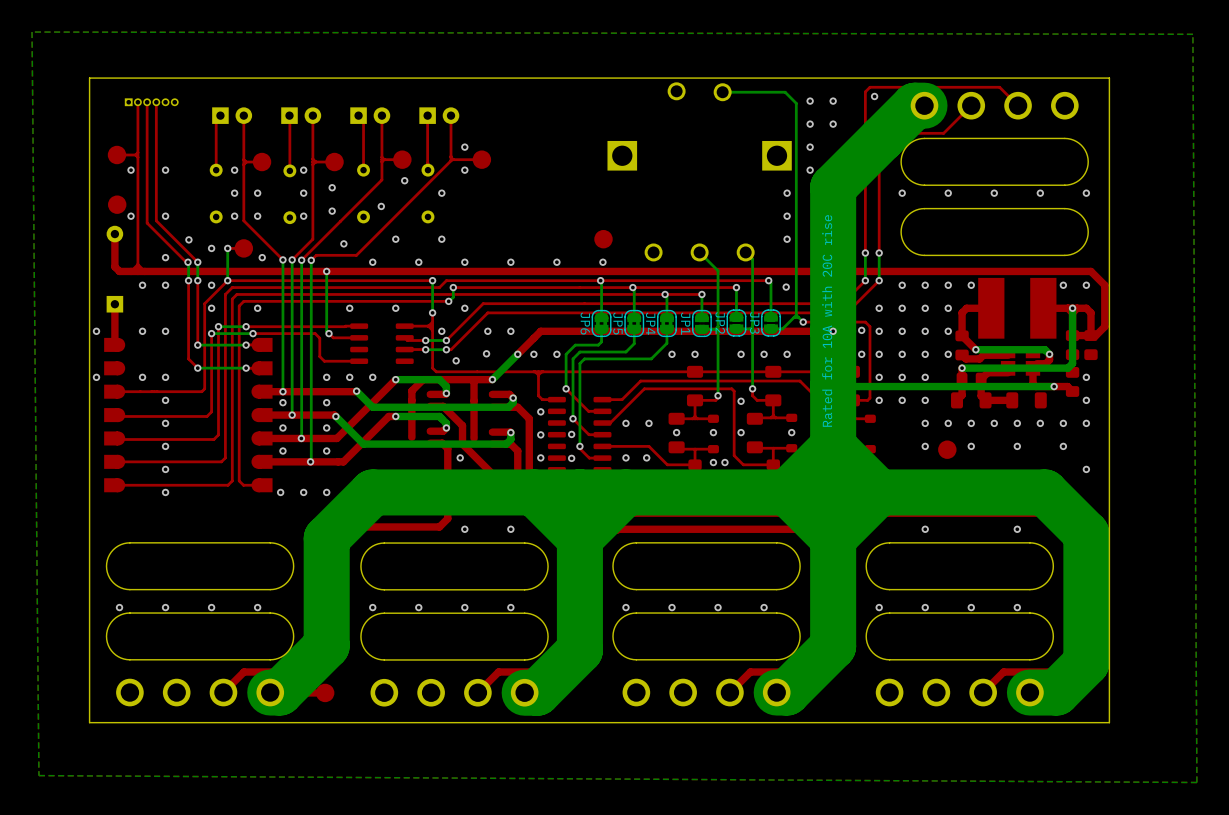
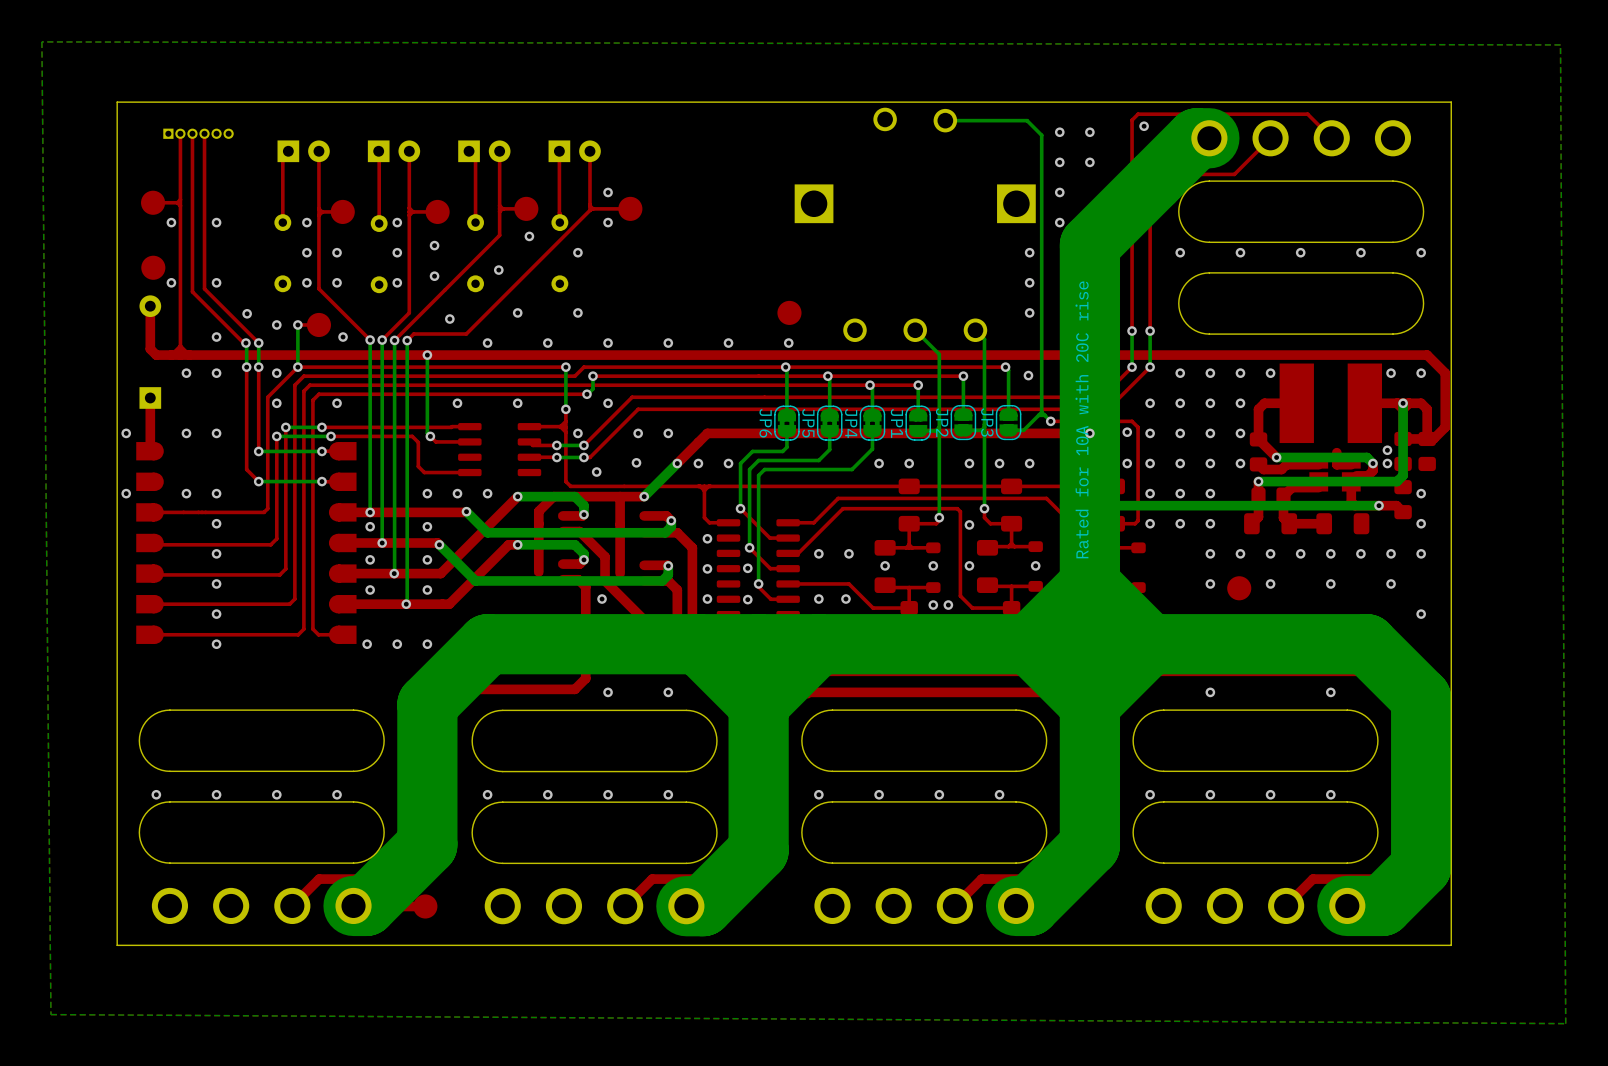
via: none -> (1387, 450)
top track: none -> (1336, 452) (1336, 464) (1351, 464)
via: none -> (1387, 463)

